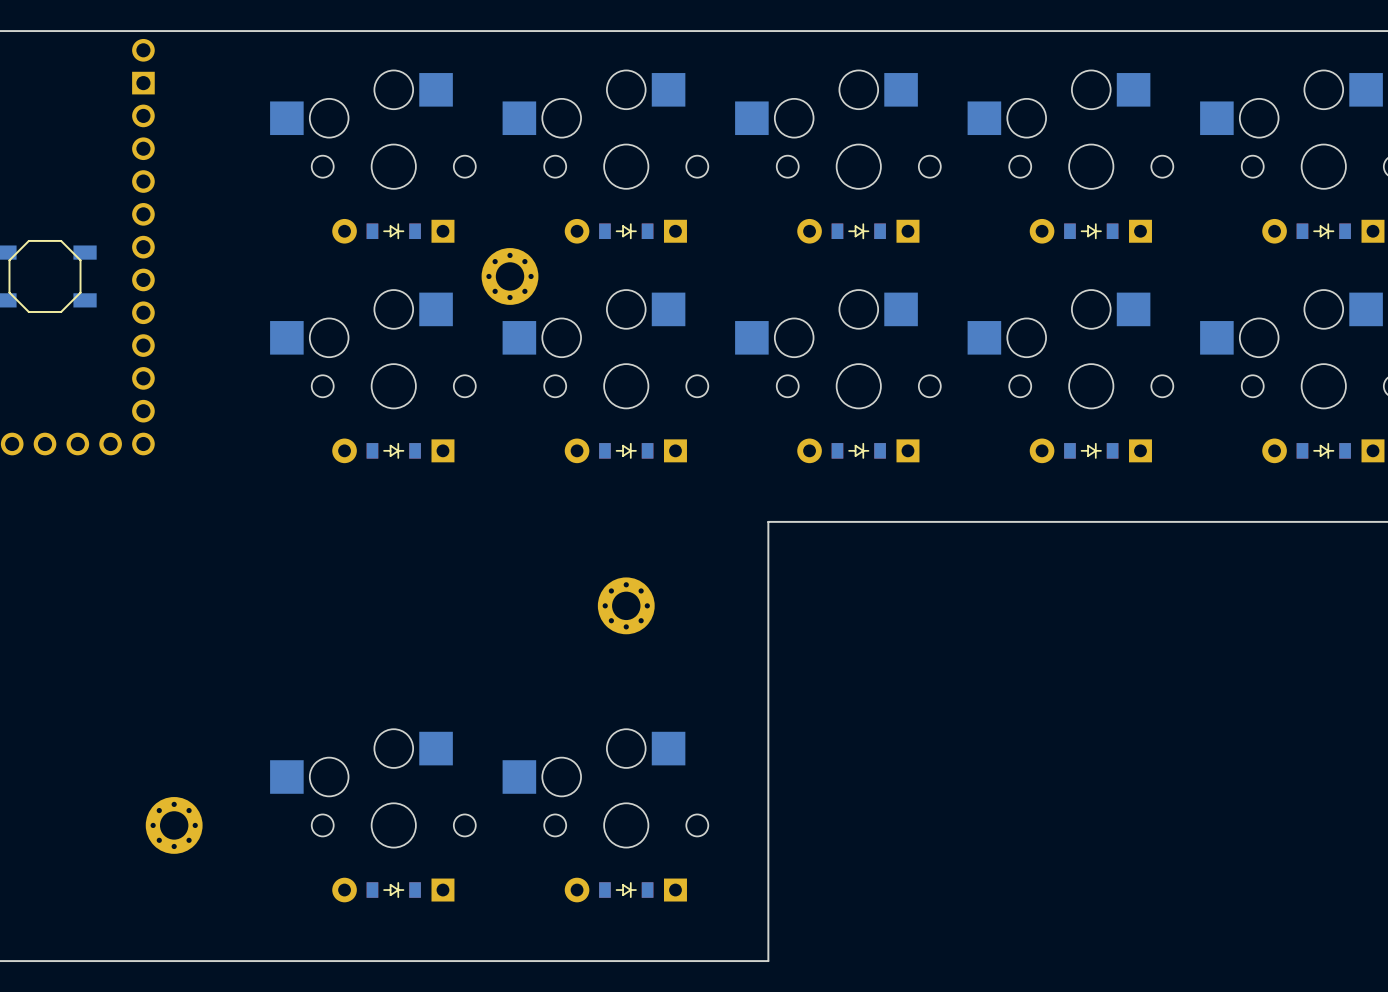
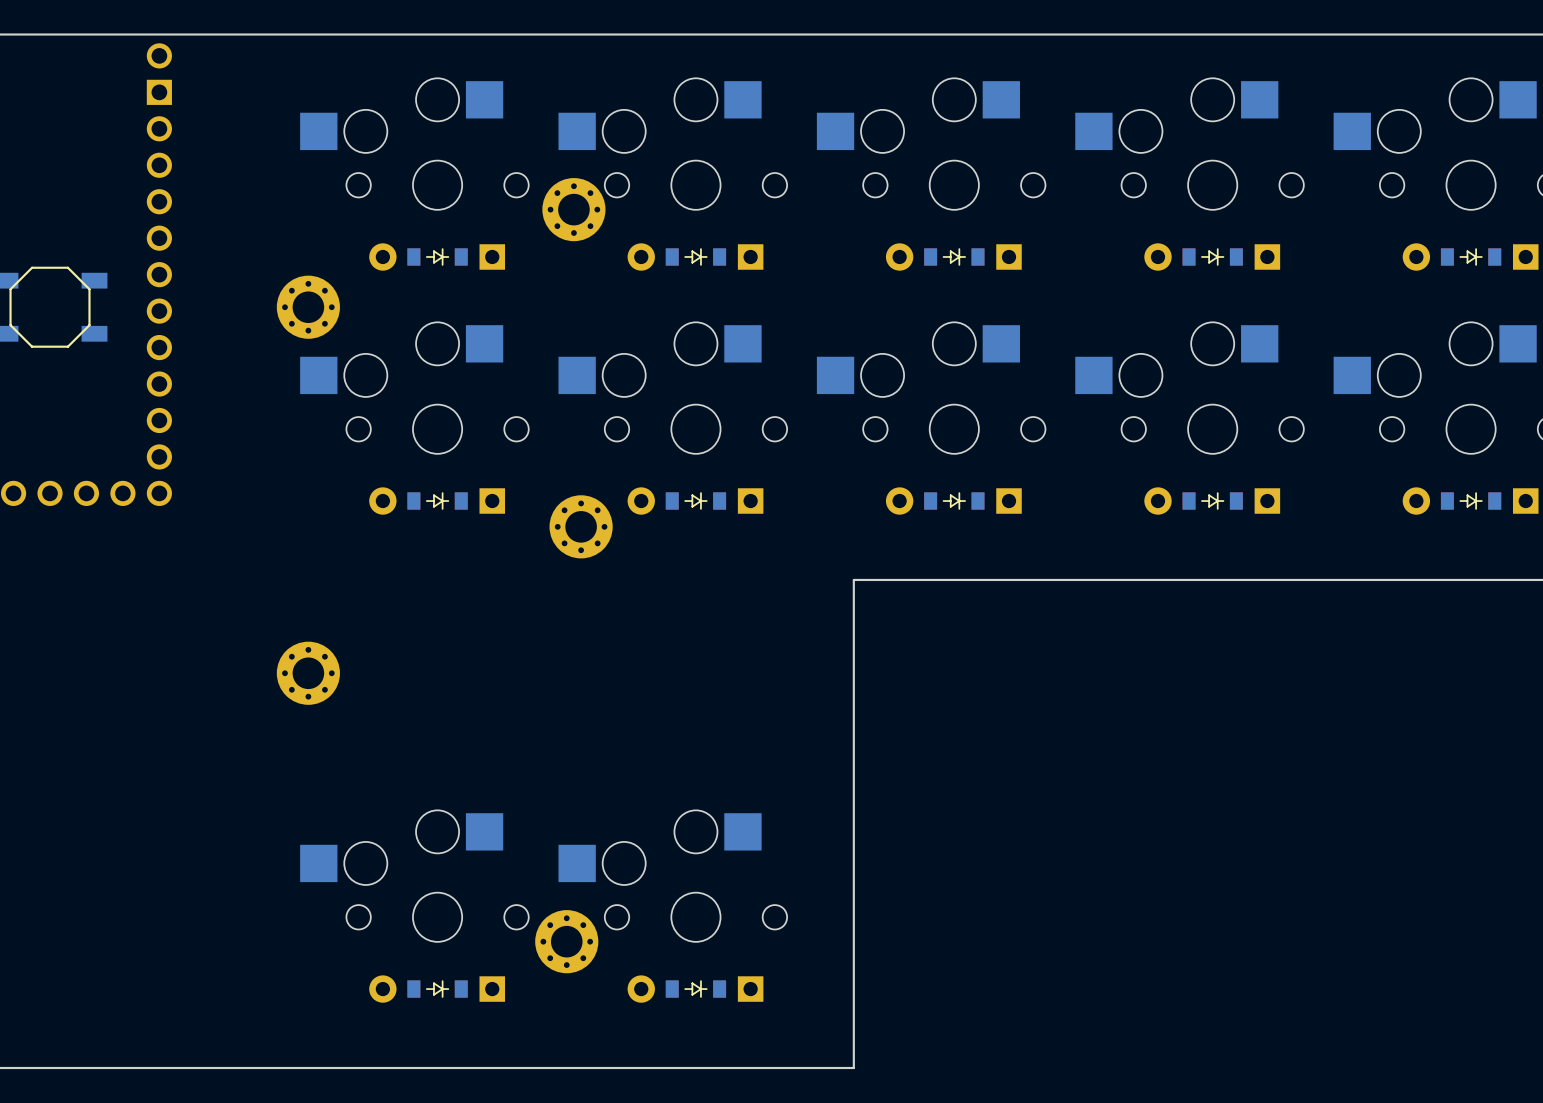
part: none -> (308, 307)
part position: (510, 276) -> (573, 209)
part: none -> (581, 526)
part: none -> (308, 673)
part: (626, 605) -> none
part: (174, 825) -> none
part: none -> (566, 941)

